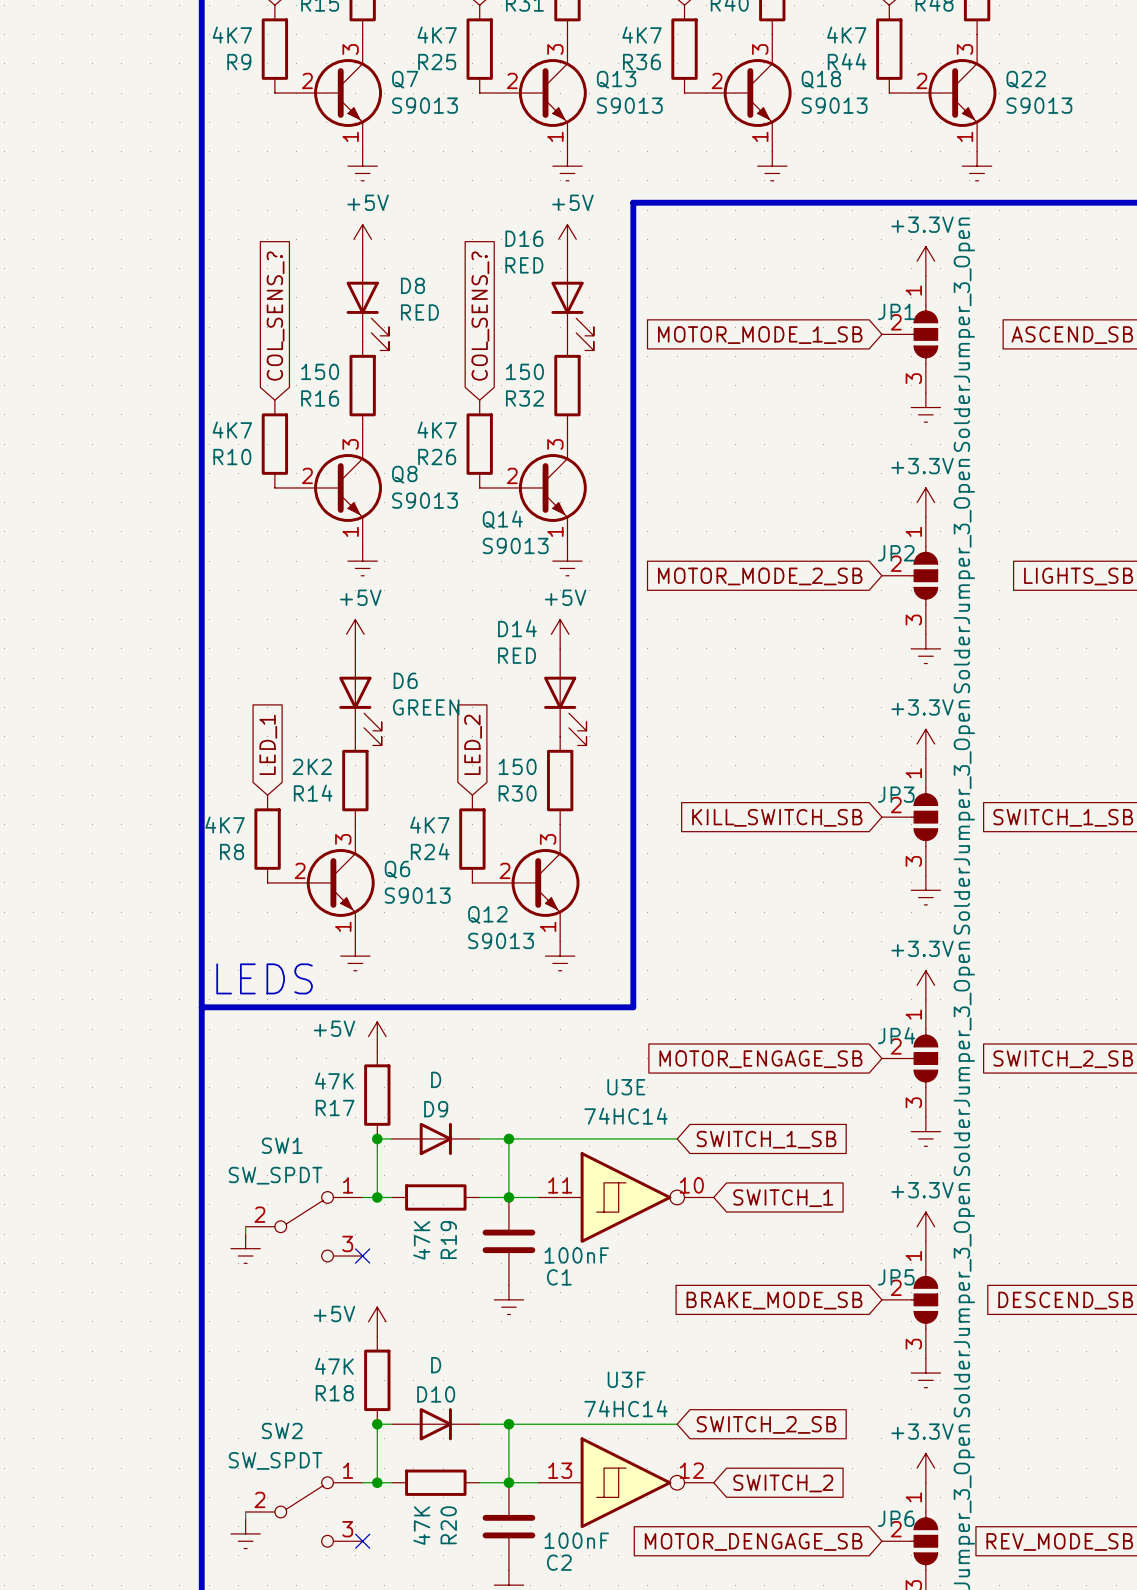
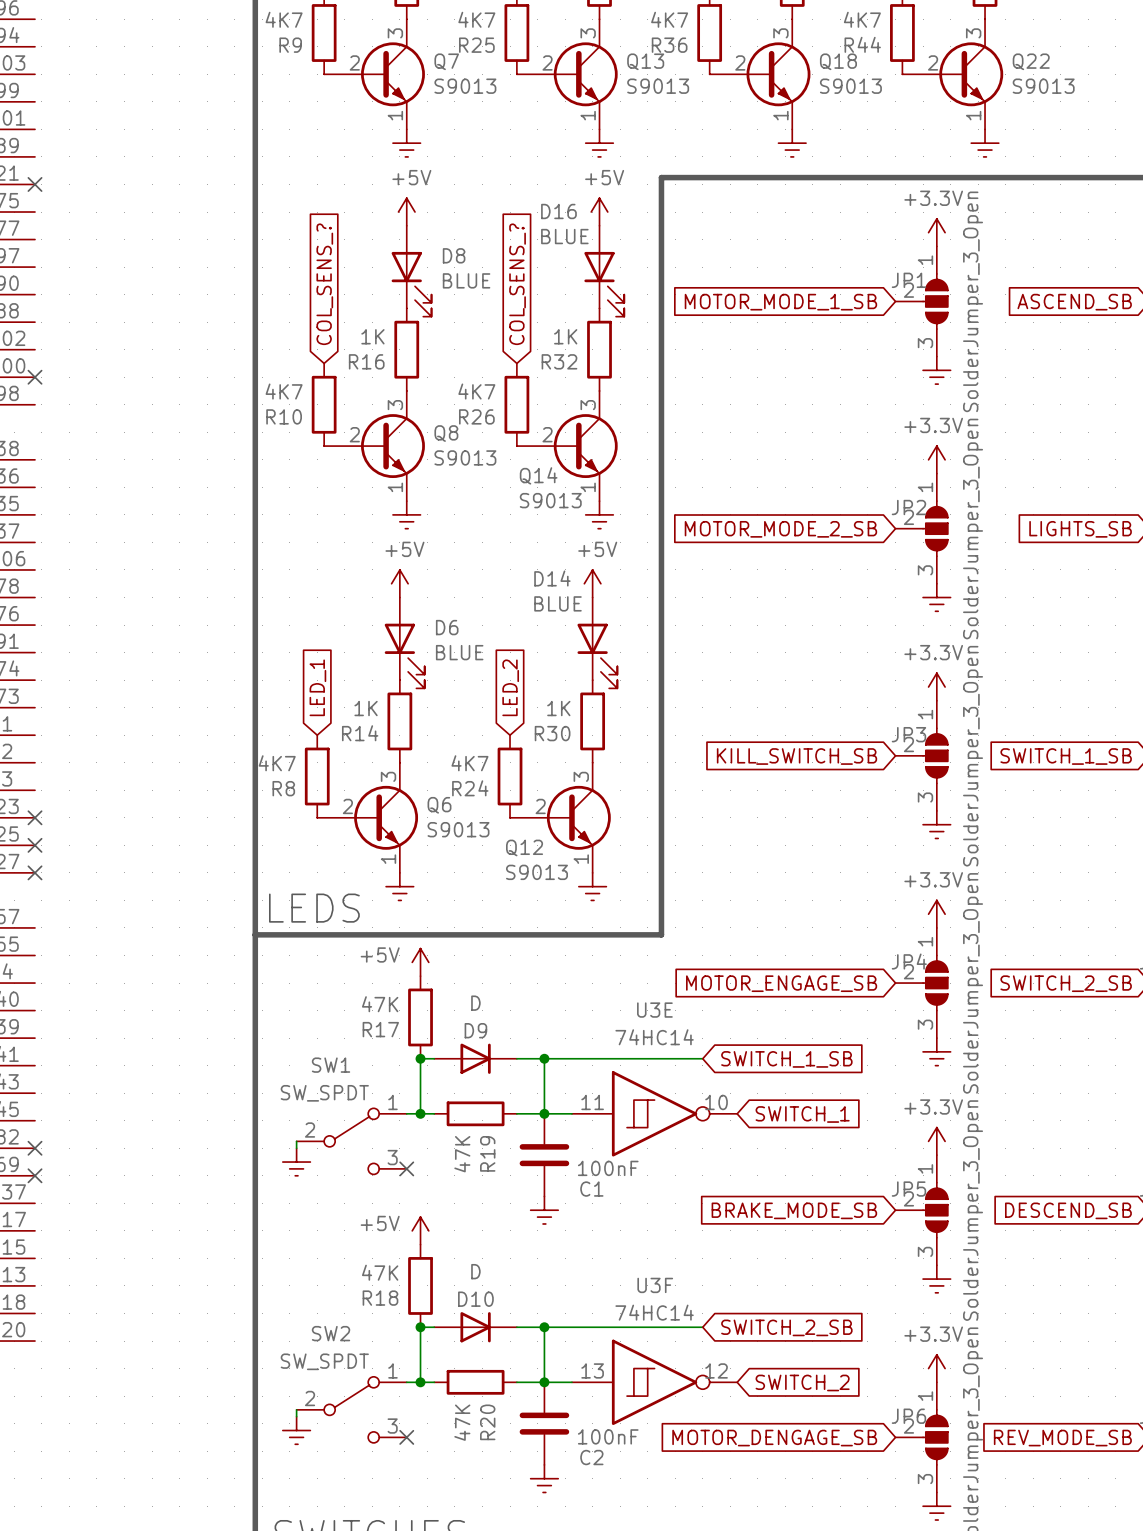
D16 value: RED (524, 265) -> BLUE (564, 236)
D8 value: RED (419, 312) -> BLUE (466, 280)
R16 value: 150 (320, 371) -> 1K (372, 336)
R32 value: 150 (524, 371) -> 1K (565, 336)
D14 value: RED (517, 655) -> BLUE (557, 603)
D6 value: GREEN (426, 707) -> BLUE (459, 652)
R14 value: 2K2 (312, 766) -> 1K (366, 708)
R30 value: 150 (517, 766) -> 1K (558, 708)

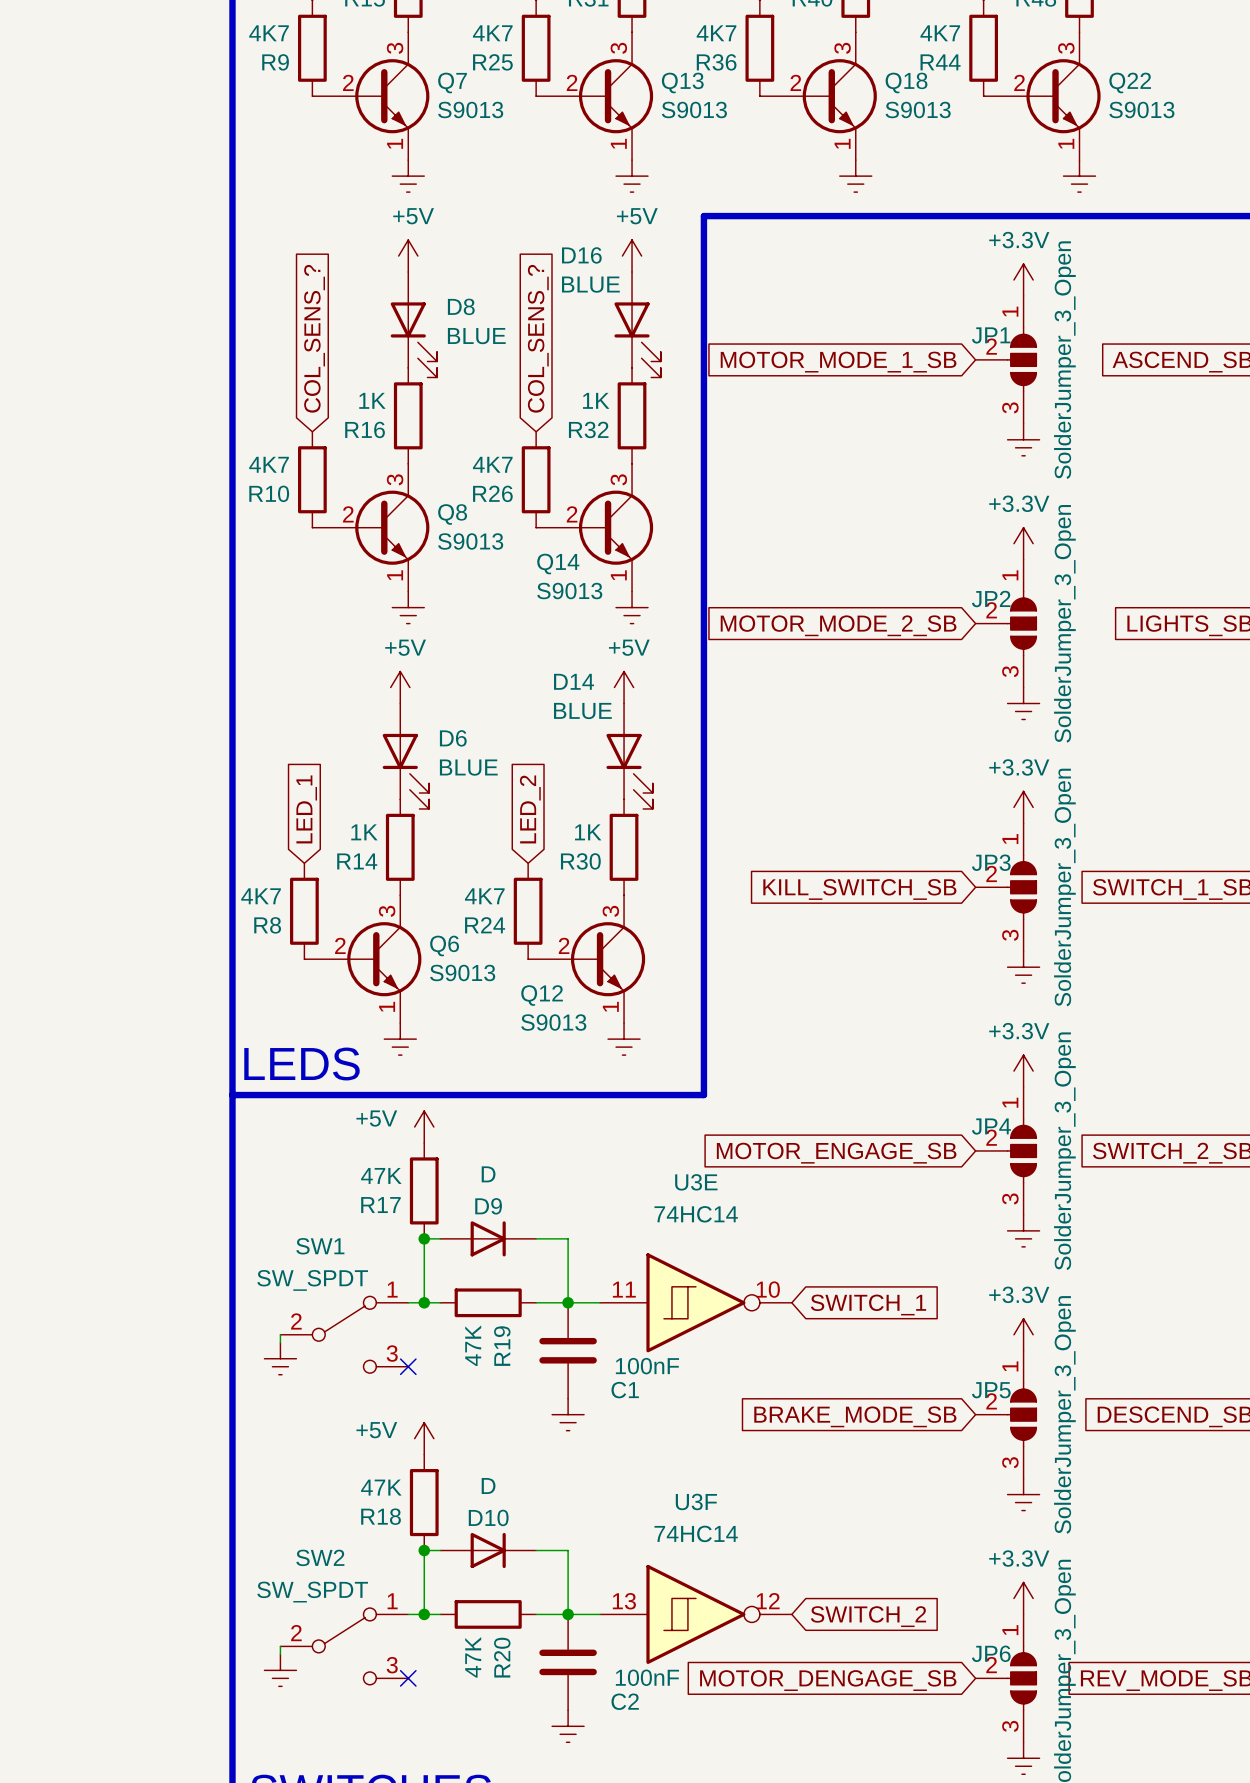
wire: (544, 1058) (702, 1058) -> none
junction: (544, 1058) -> none
global label: SWITCH_1_SB (786, 1059) -> none
wire: (544, 1327) (702, 1327) -> none
junction: (544, 1327) -> none
global label: SWITCH_2_SB (786, 1327) -> none

